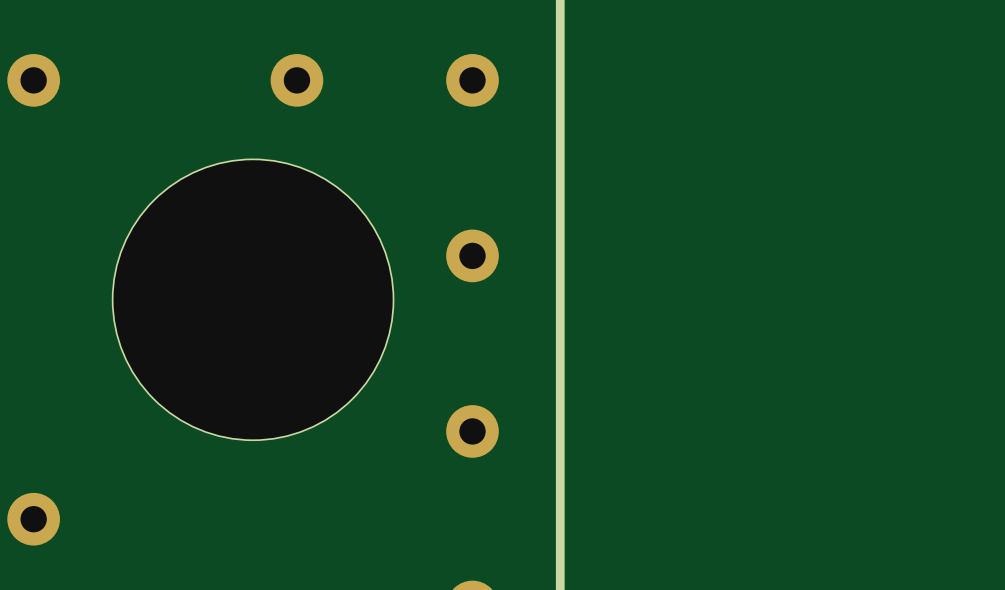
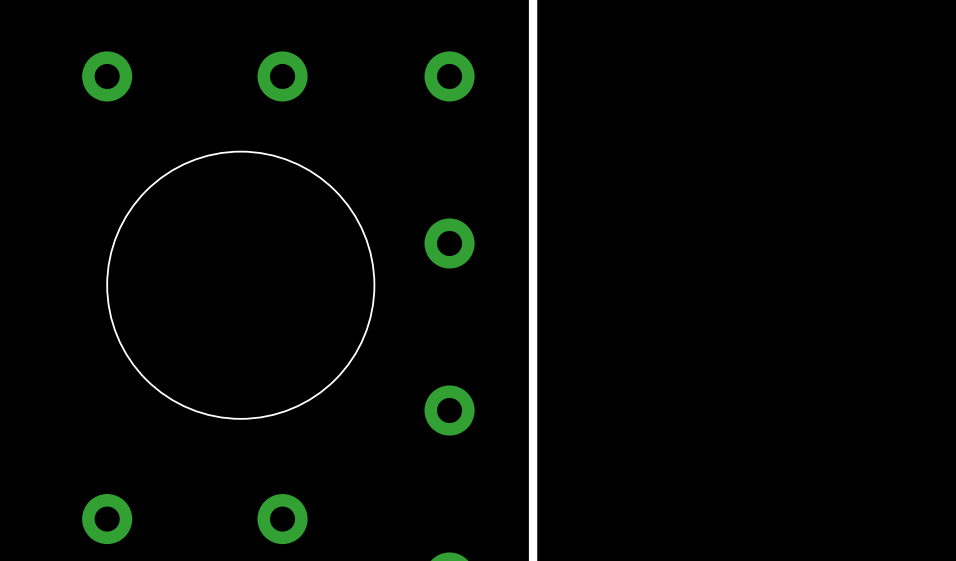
via: (33, 80) -> none
via: none -> (107, 76)
via: (33, 519) -> none
via: none -> (107, 519)
via: none -> (282, 519)

